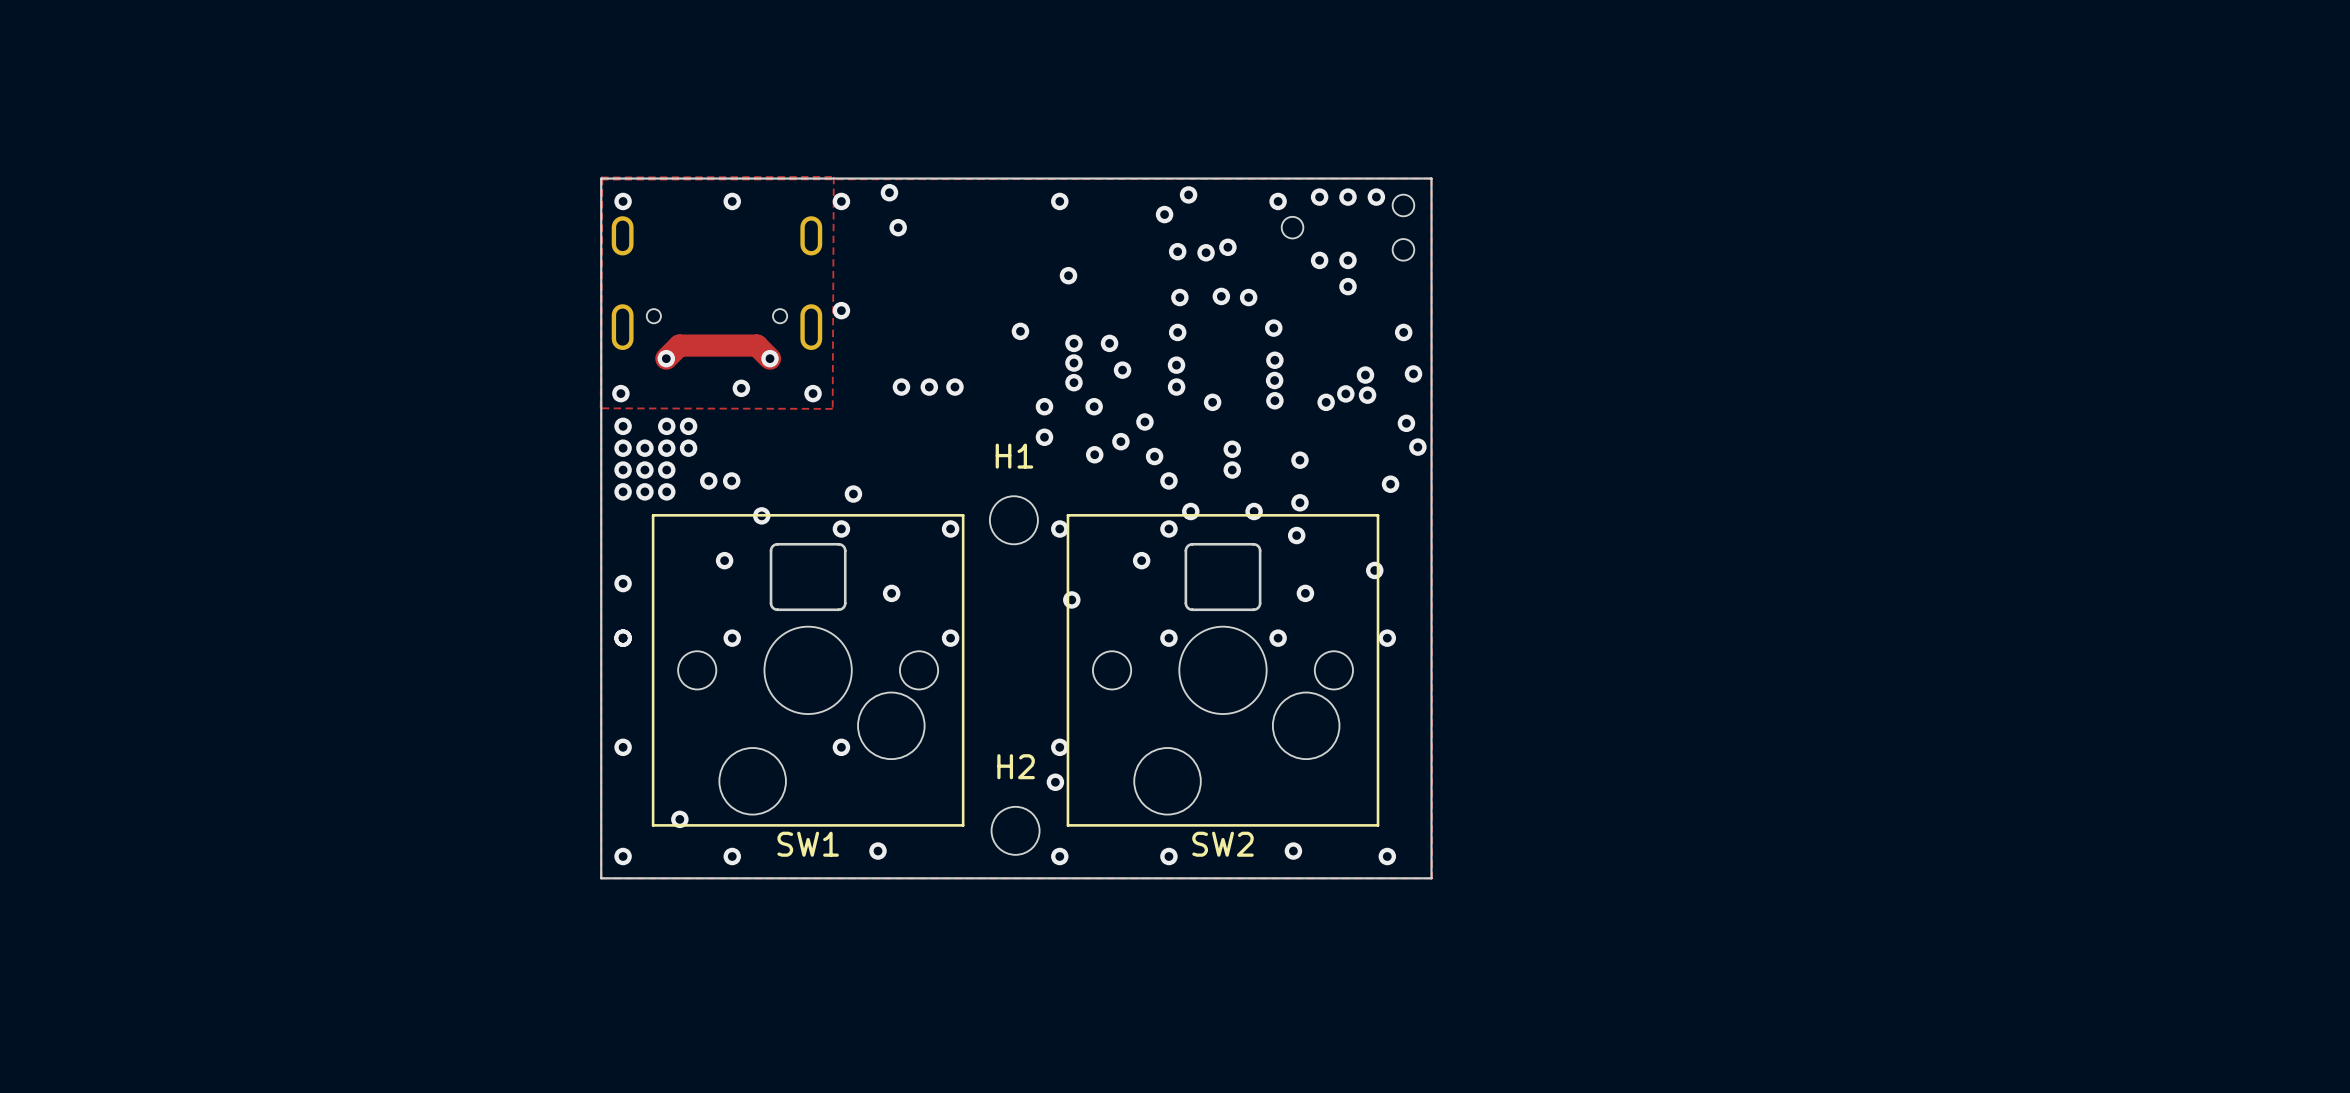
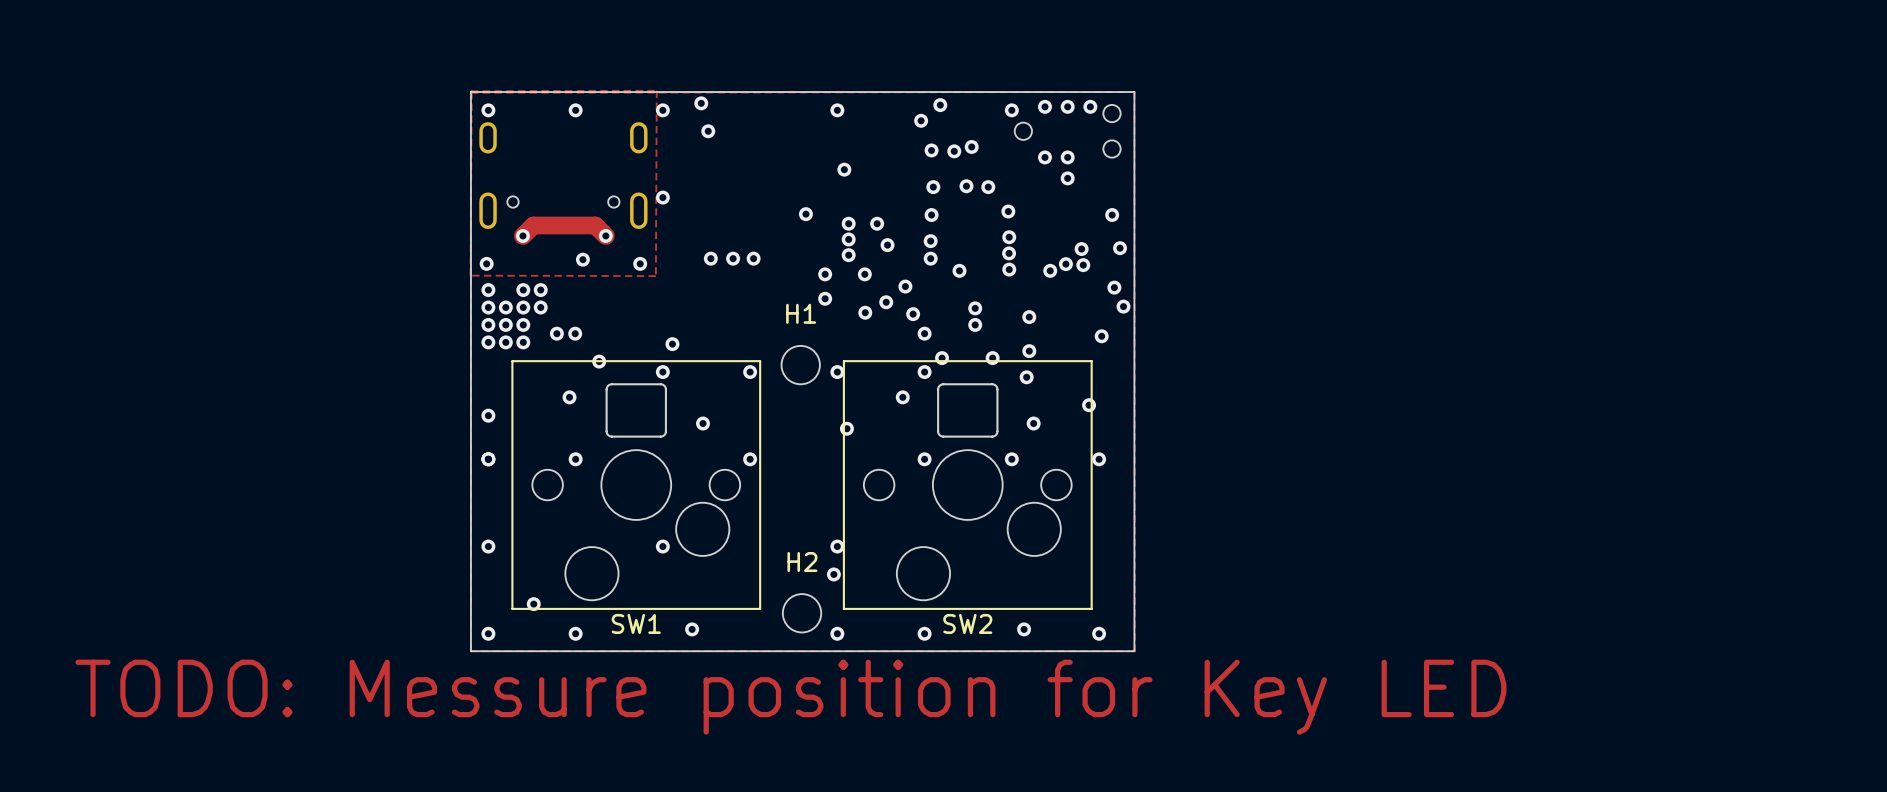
text: none -> TODO: Messure position for Key LED (790, 697)

